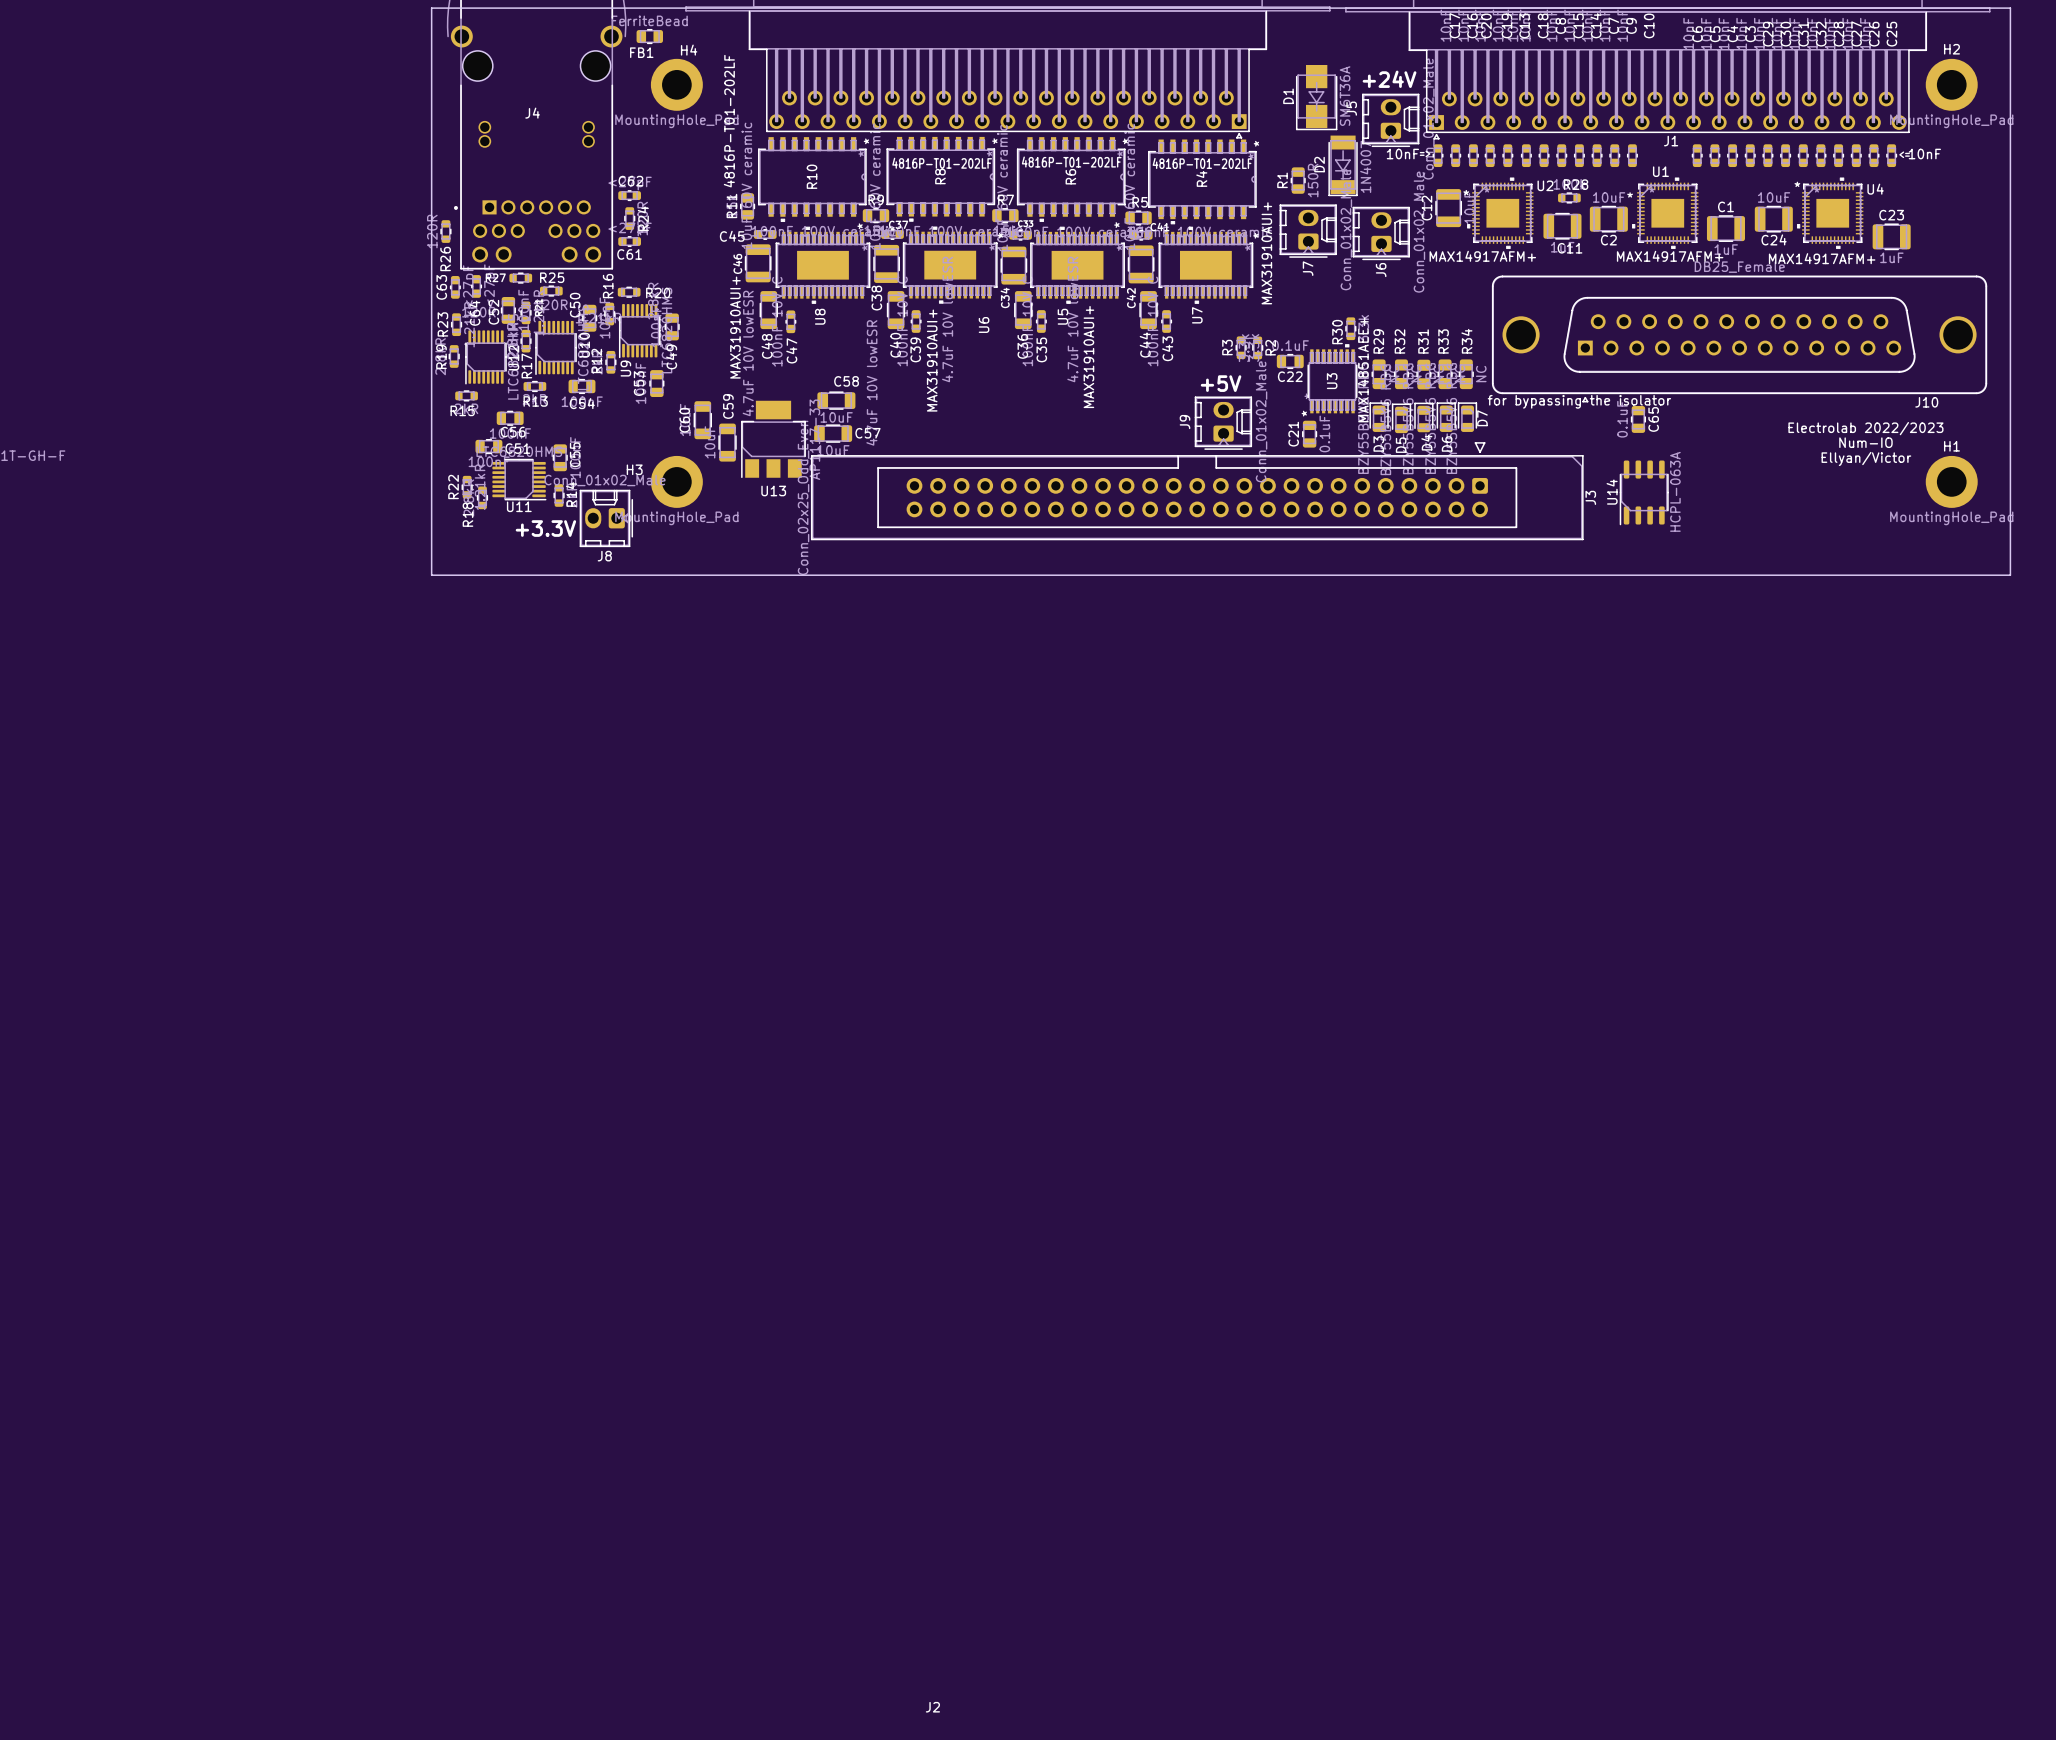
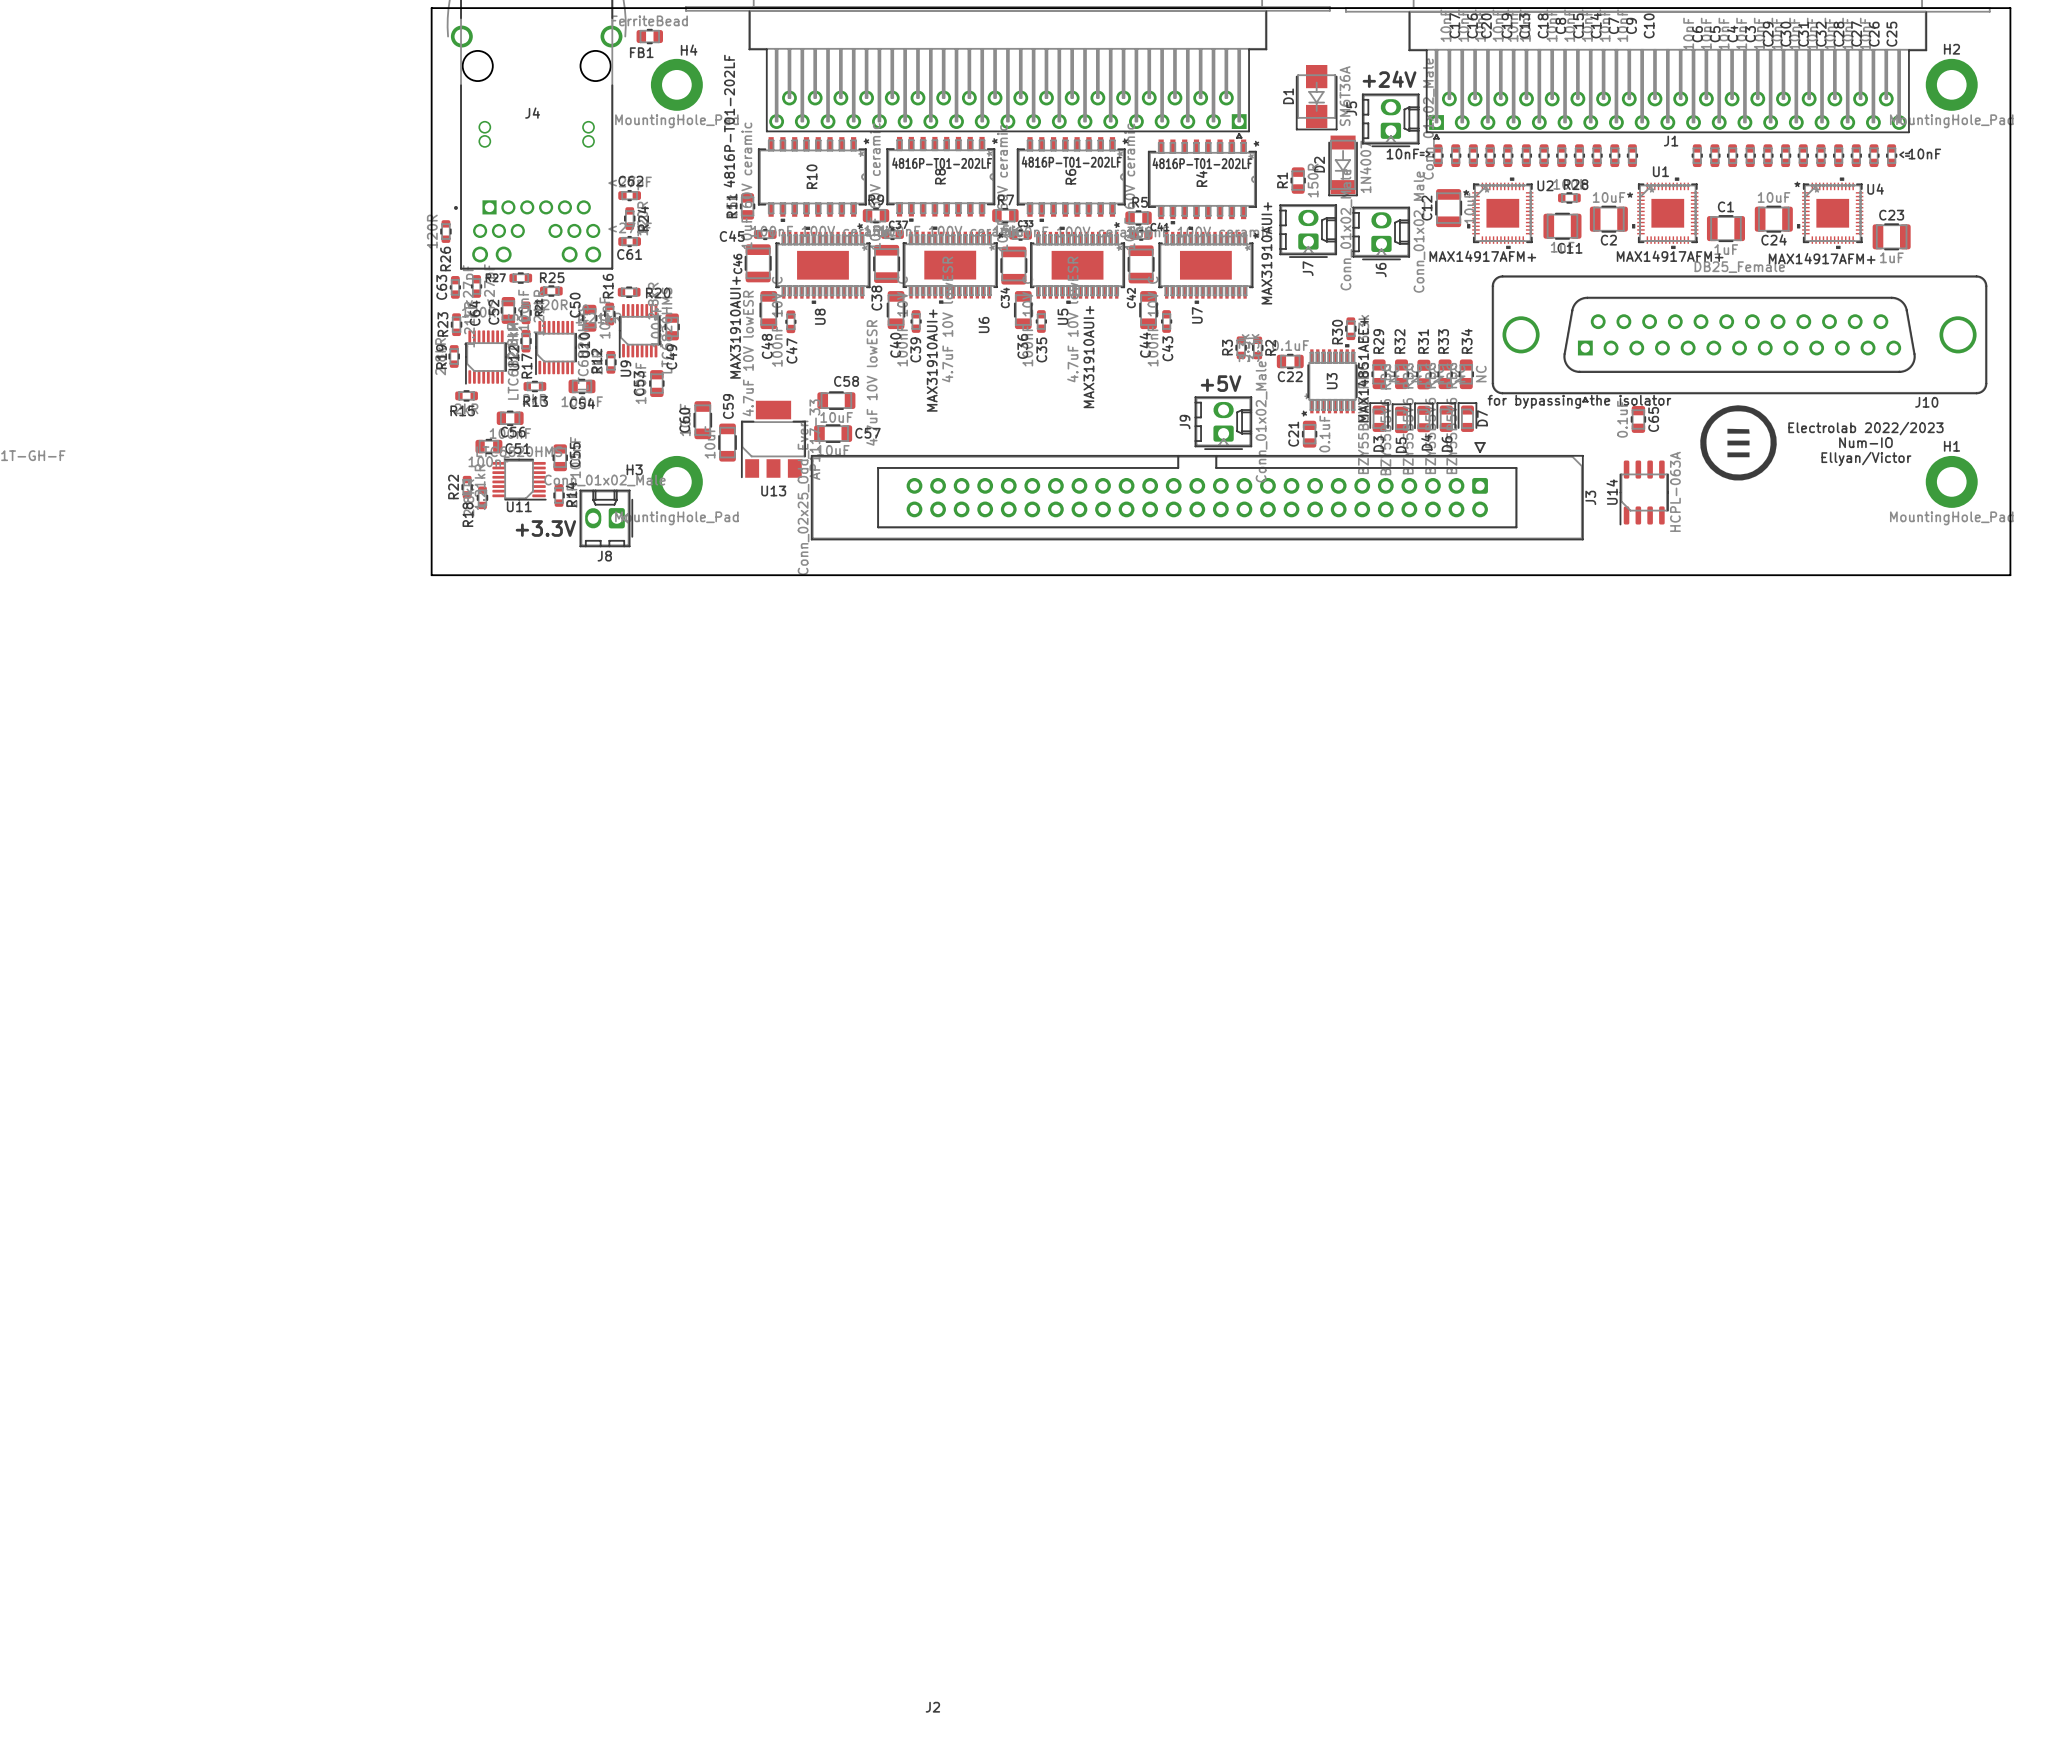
drawing: none -> [1700, 405, 1777, 481]

